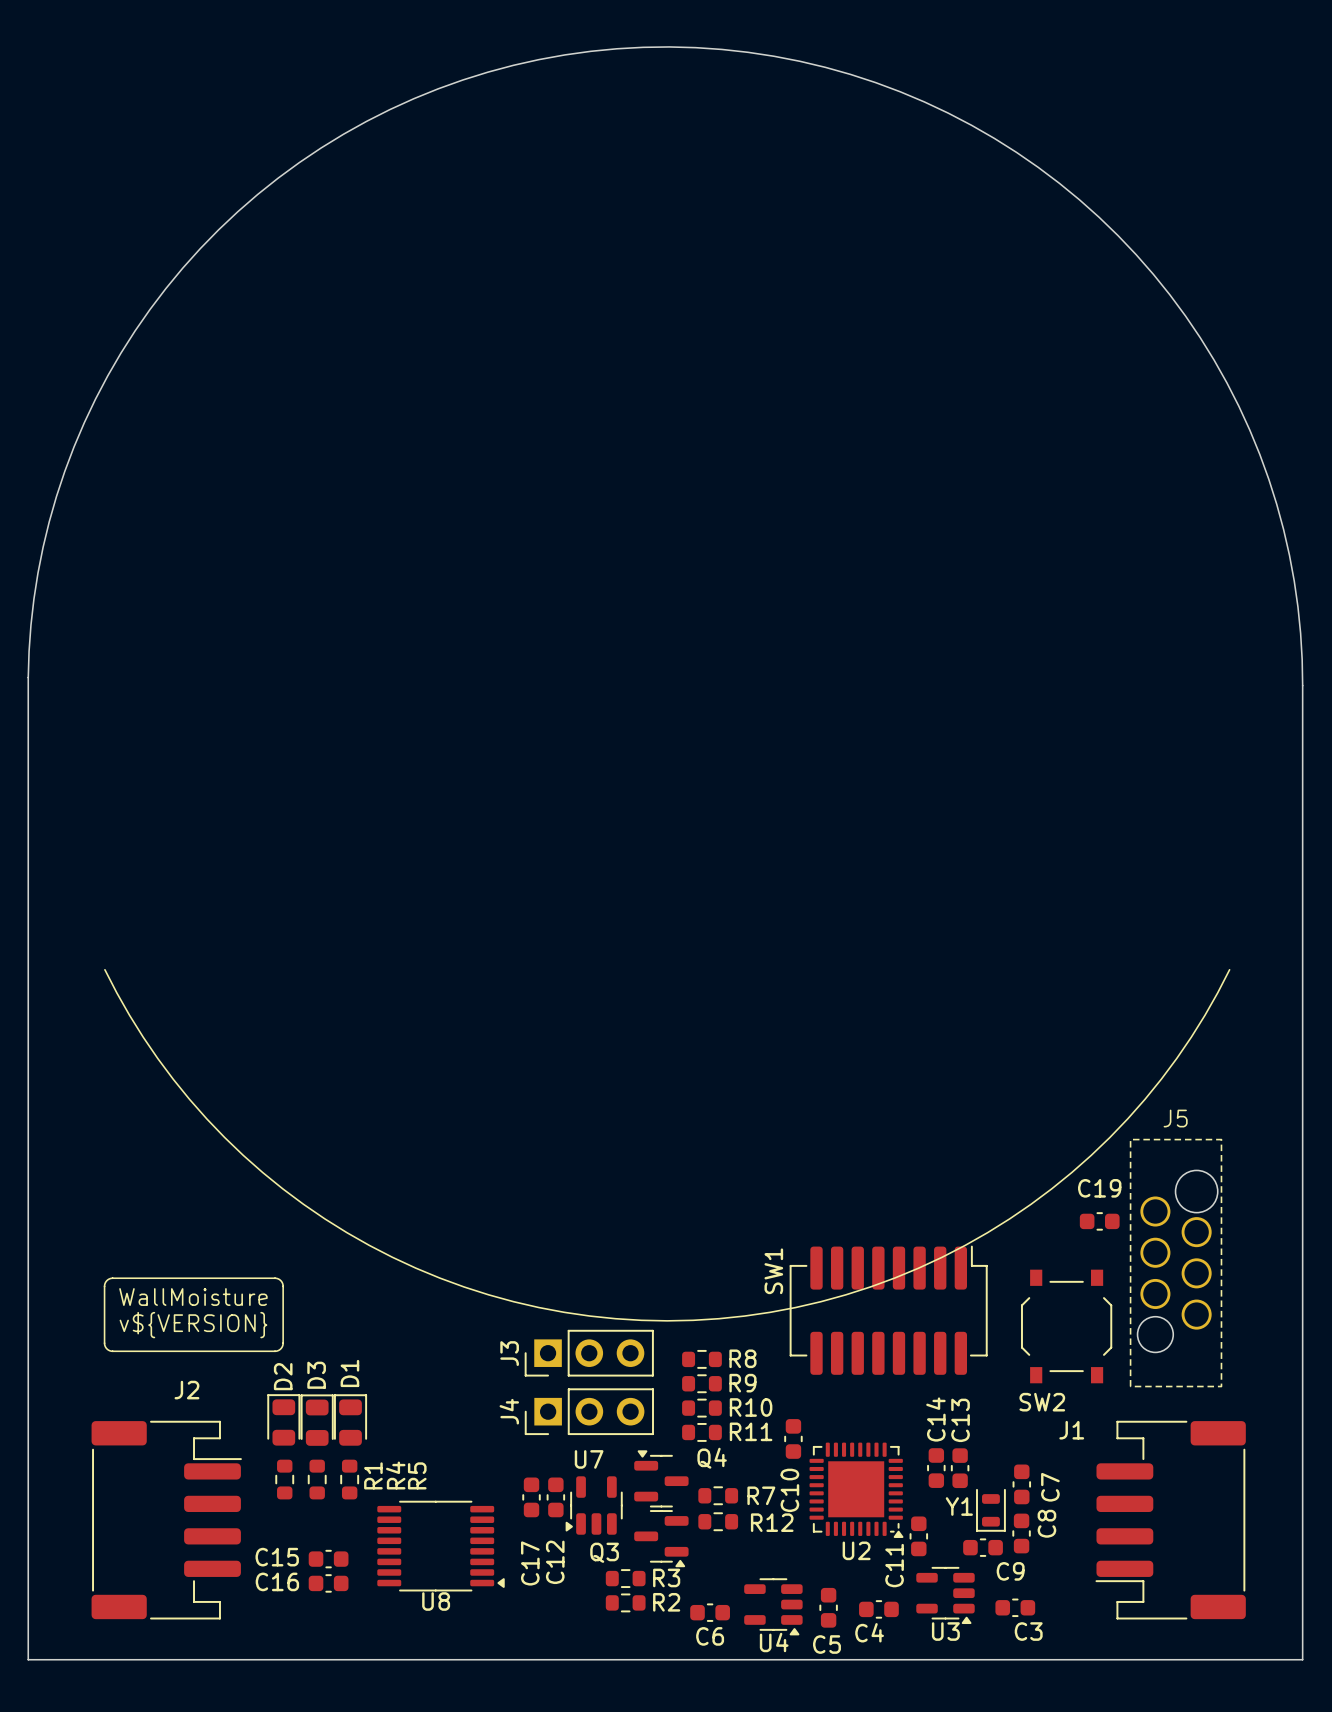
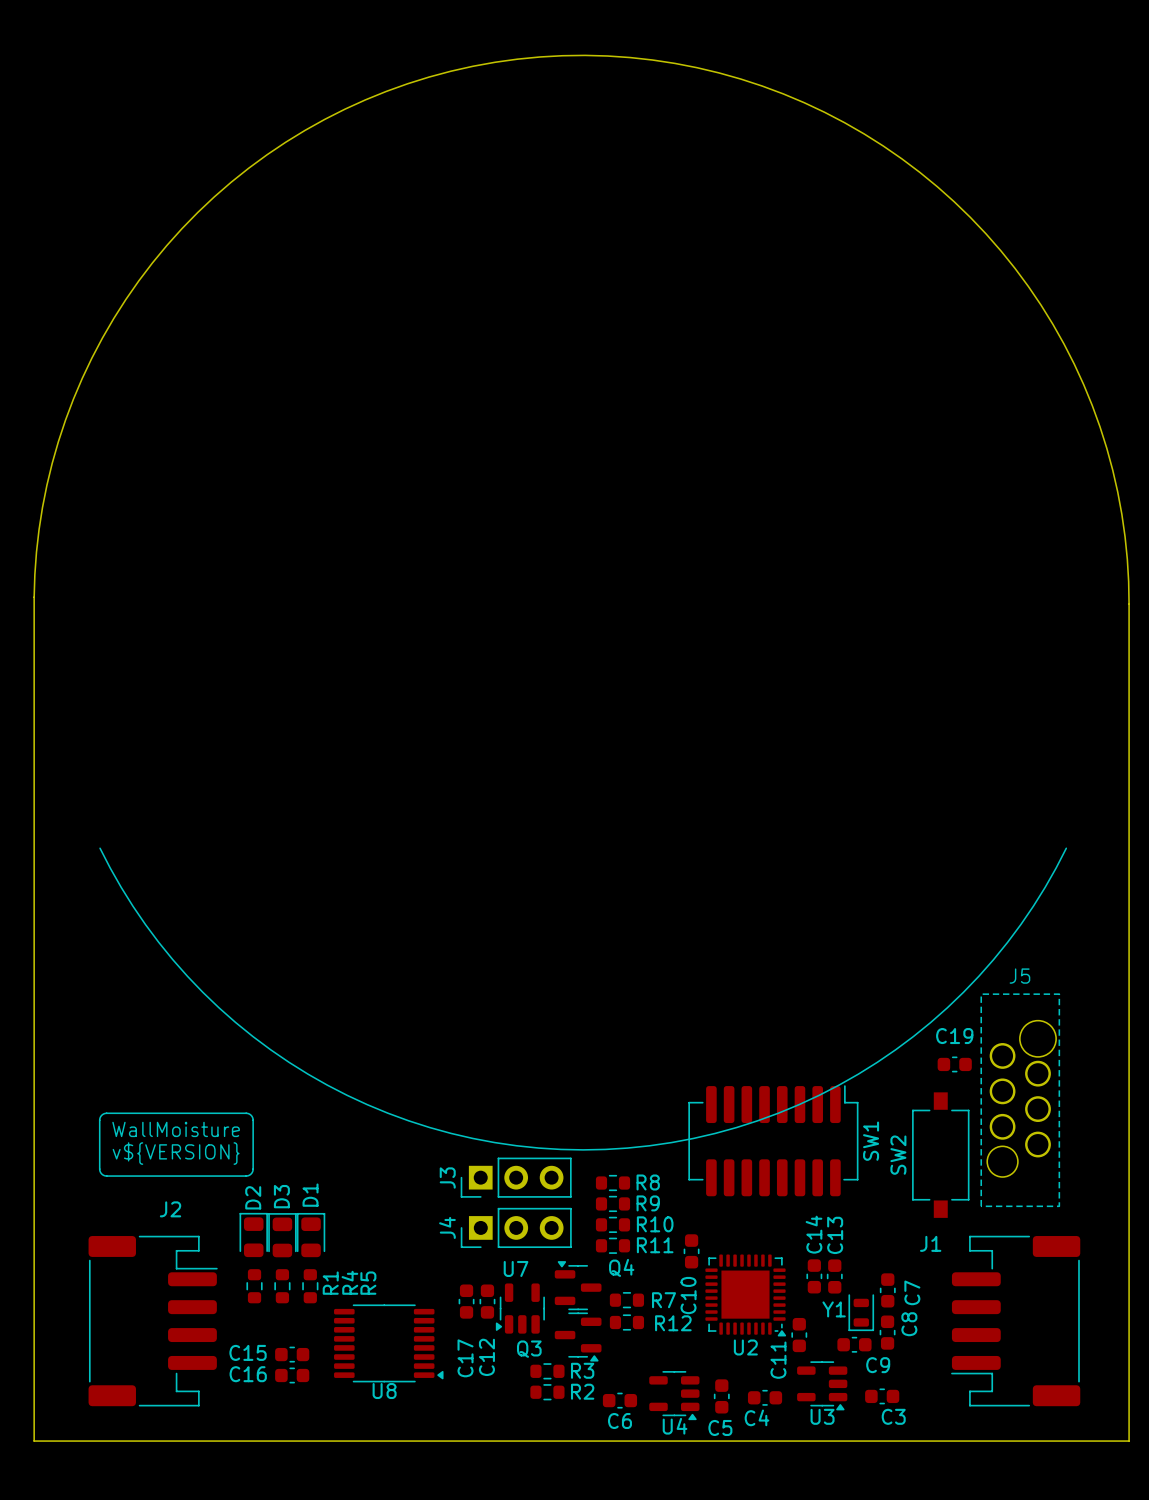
SW2 footprint: [1021, 1269, 1113, 1384] -> [912, 1092, 970, 1218]
SW1 name position: SW1 (773, 1271) -> SW1 (871, 1141)
SW2 name position: SW2 (1042, 1402) -> SW2 (898, 1155)

